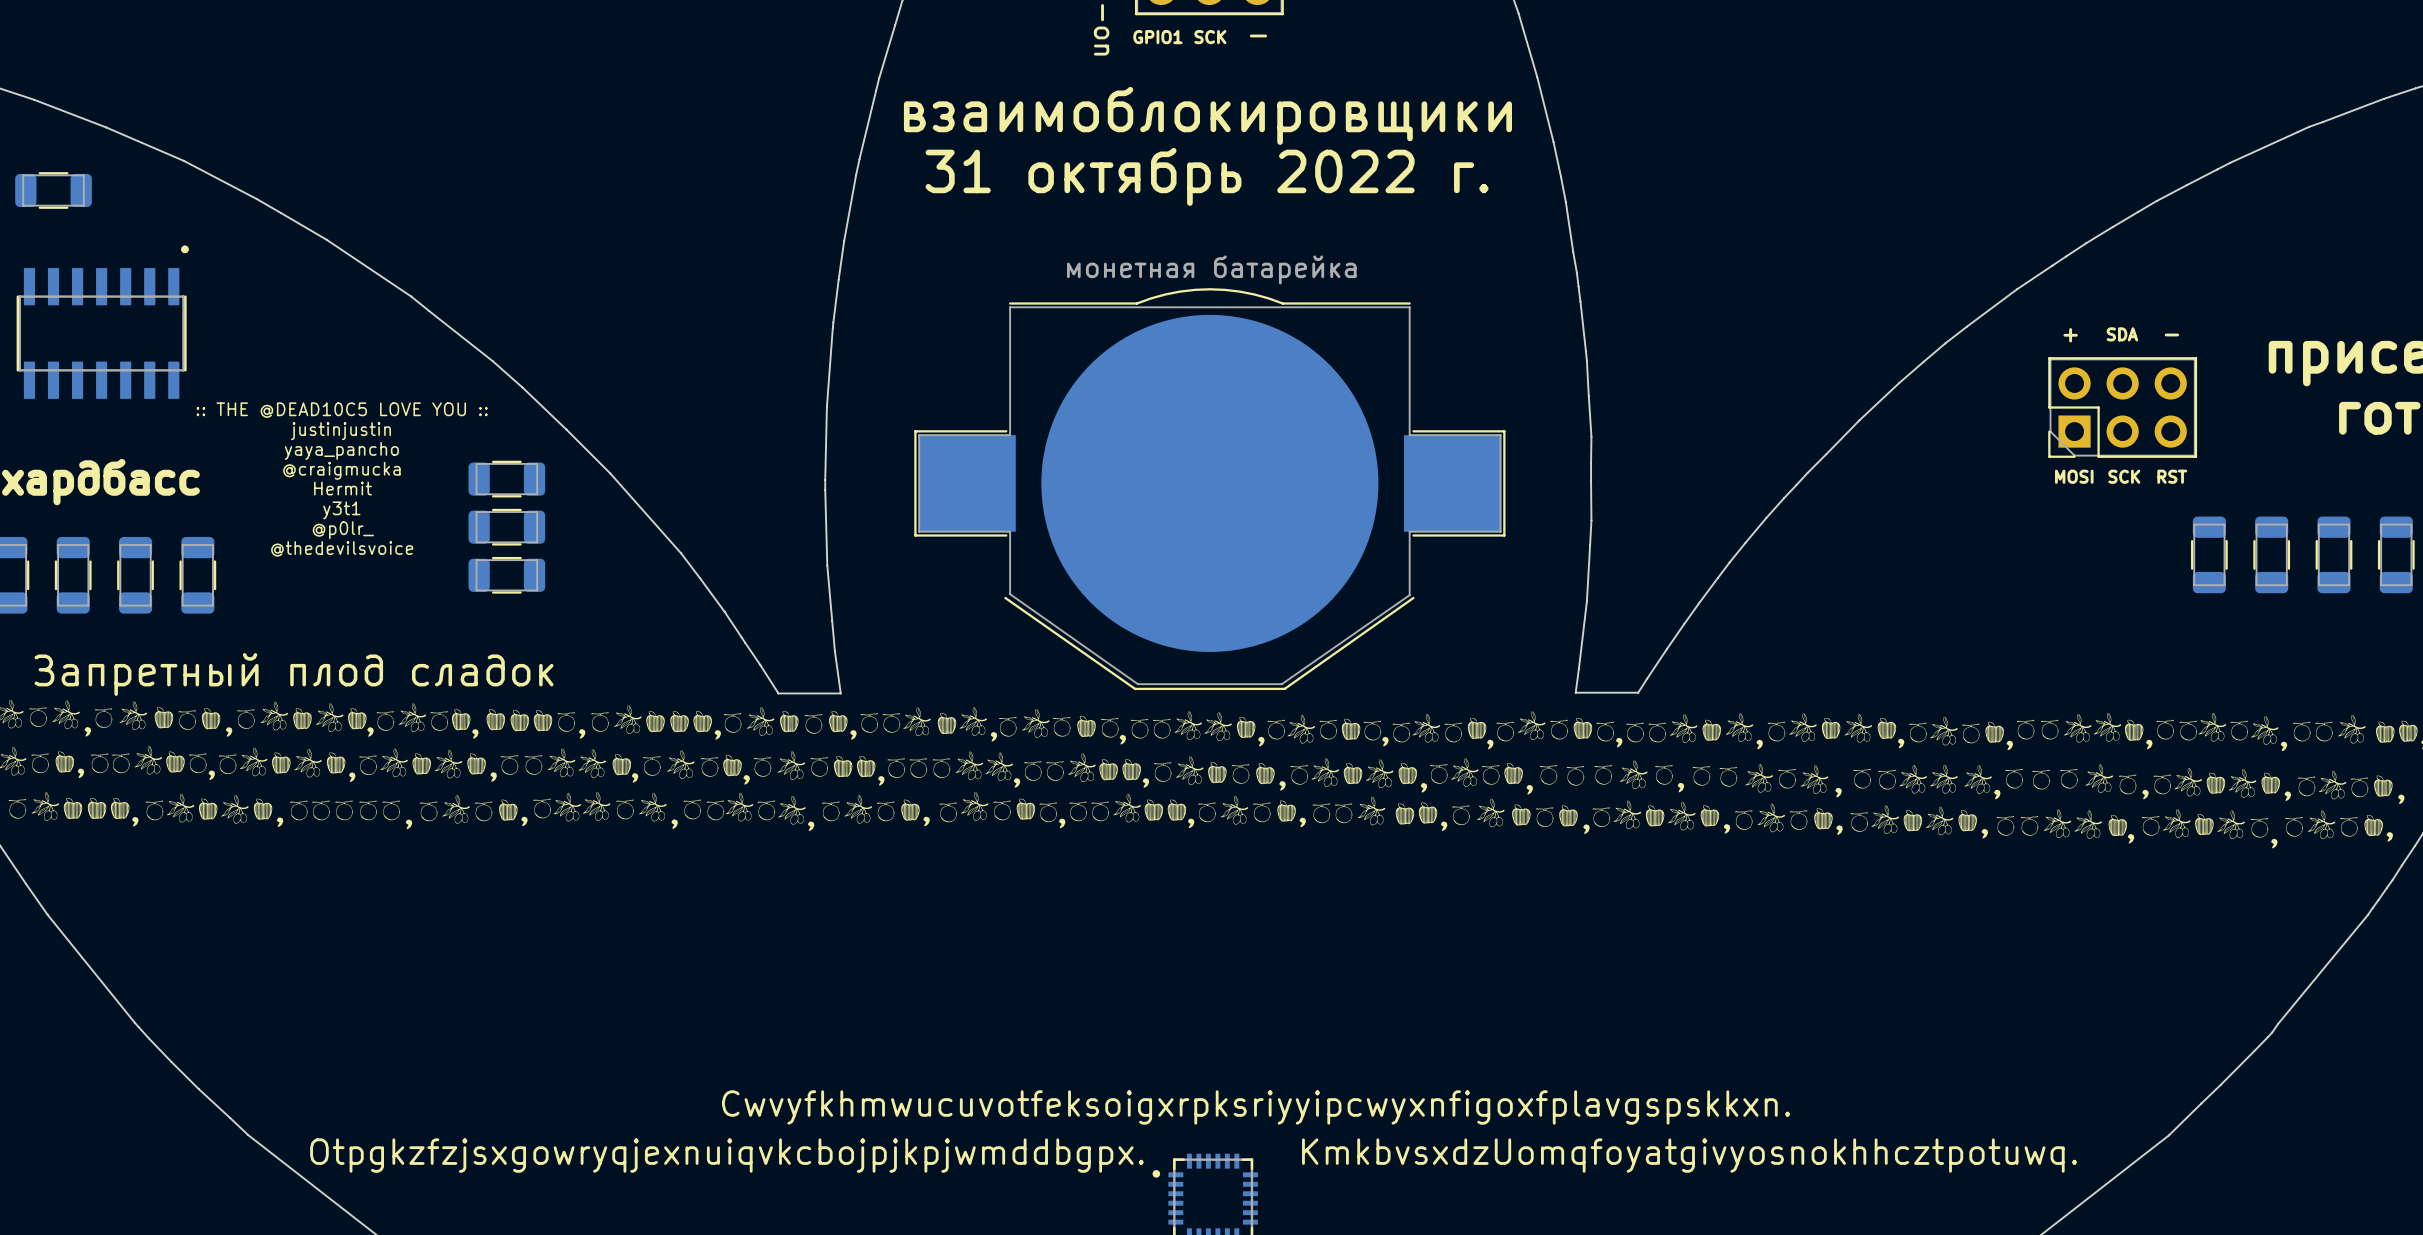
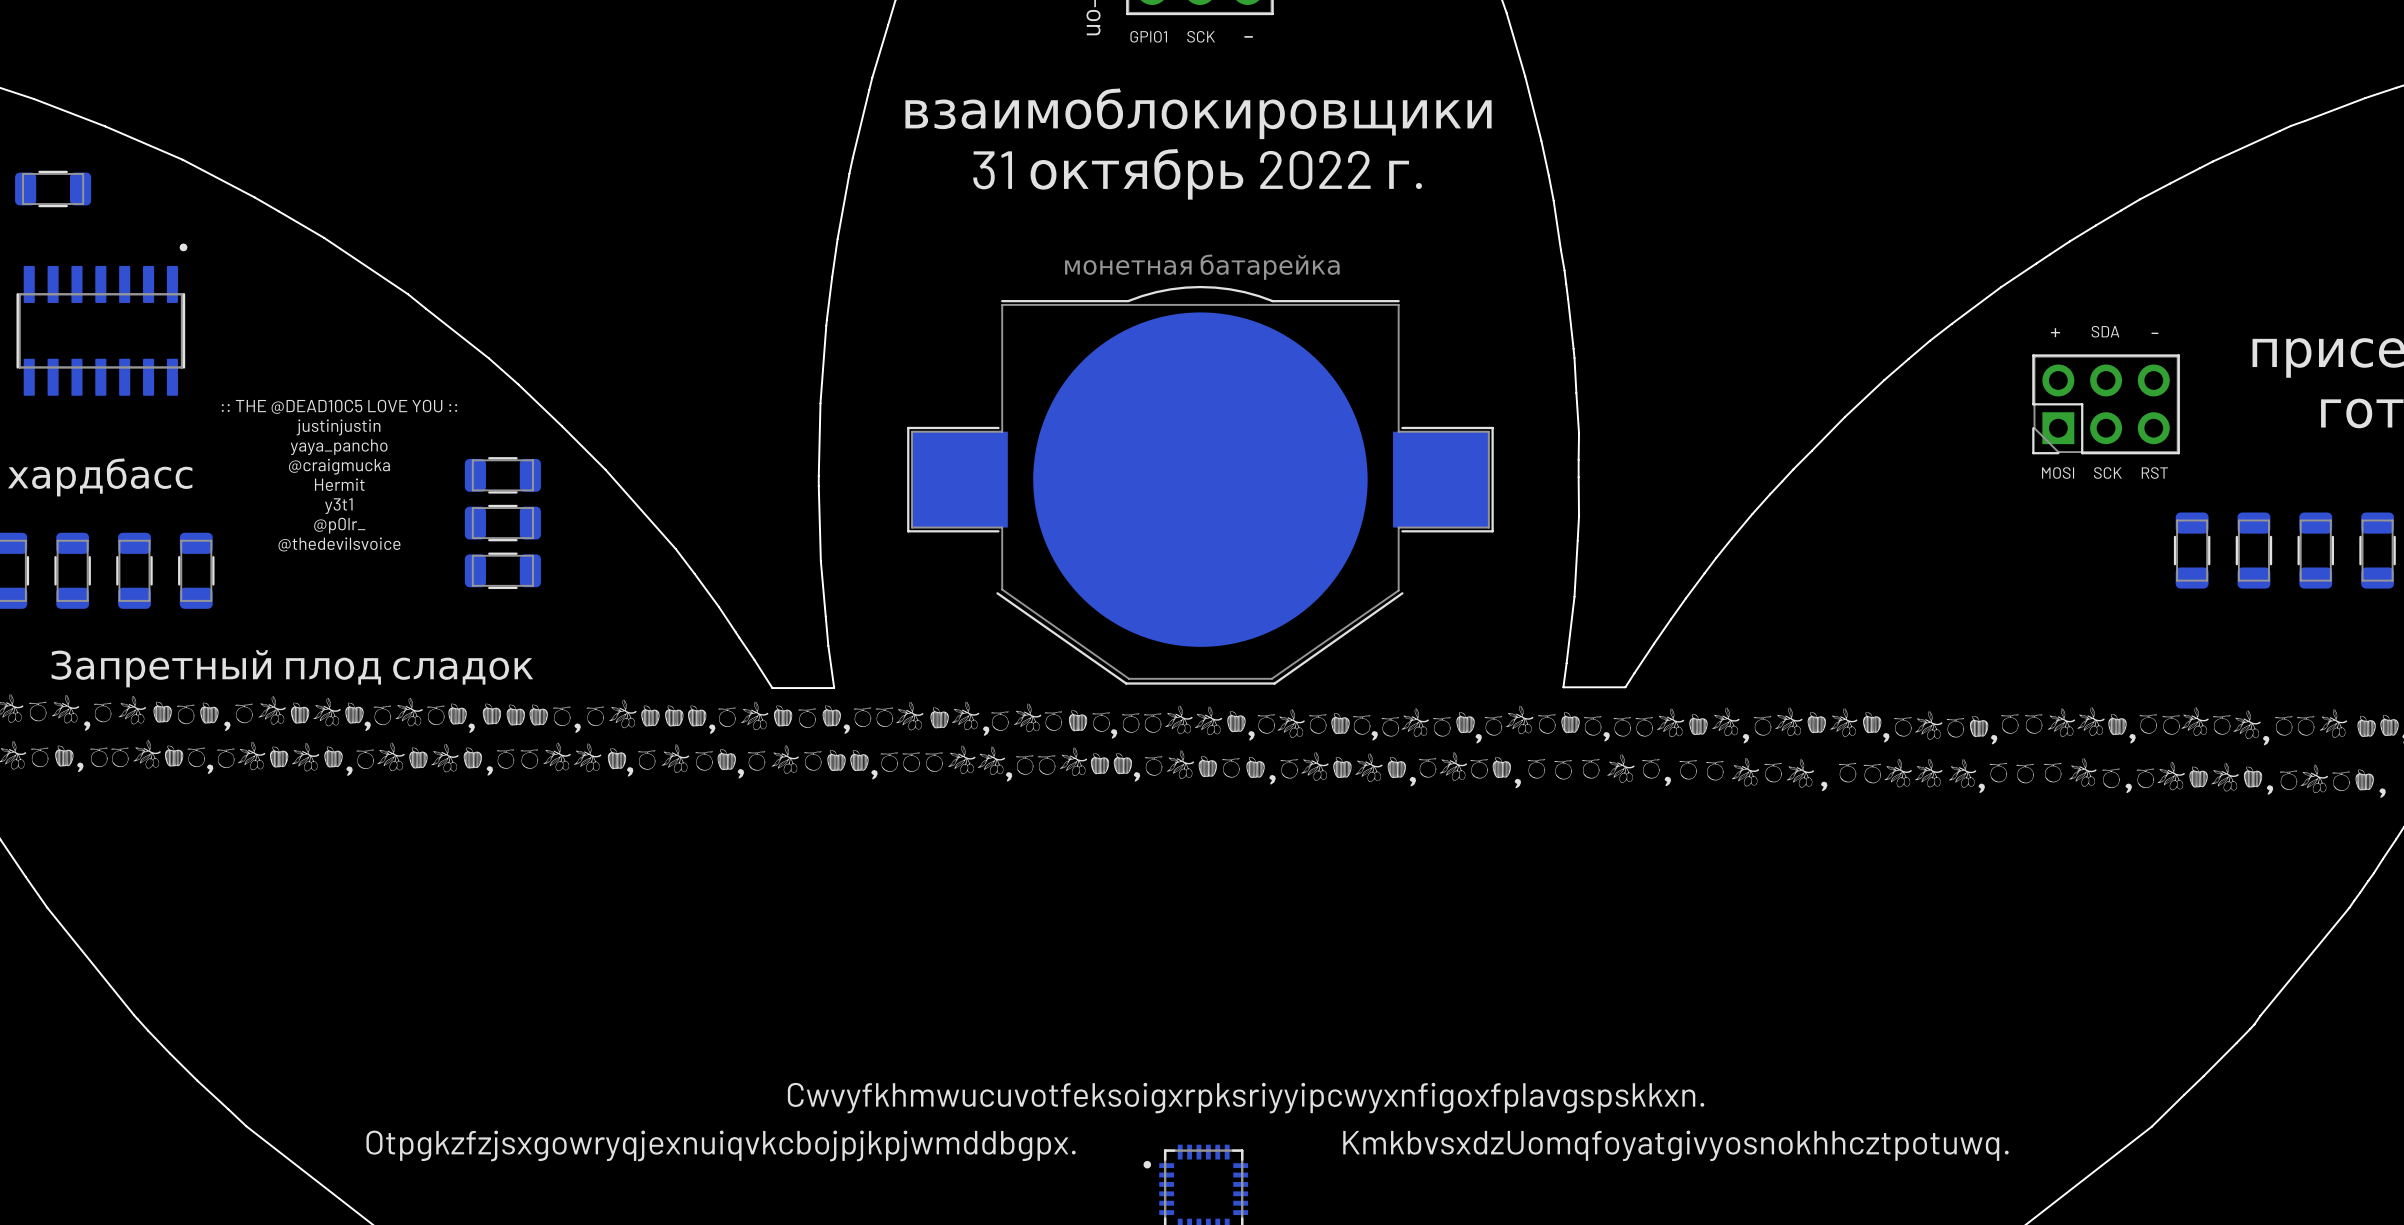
drawing: [8, 792, 2394, 849] -> none

